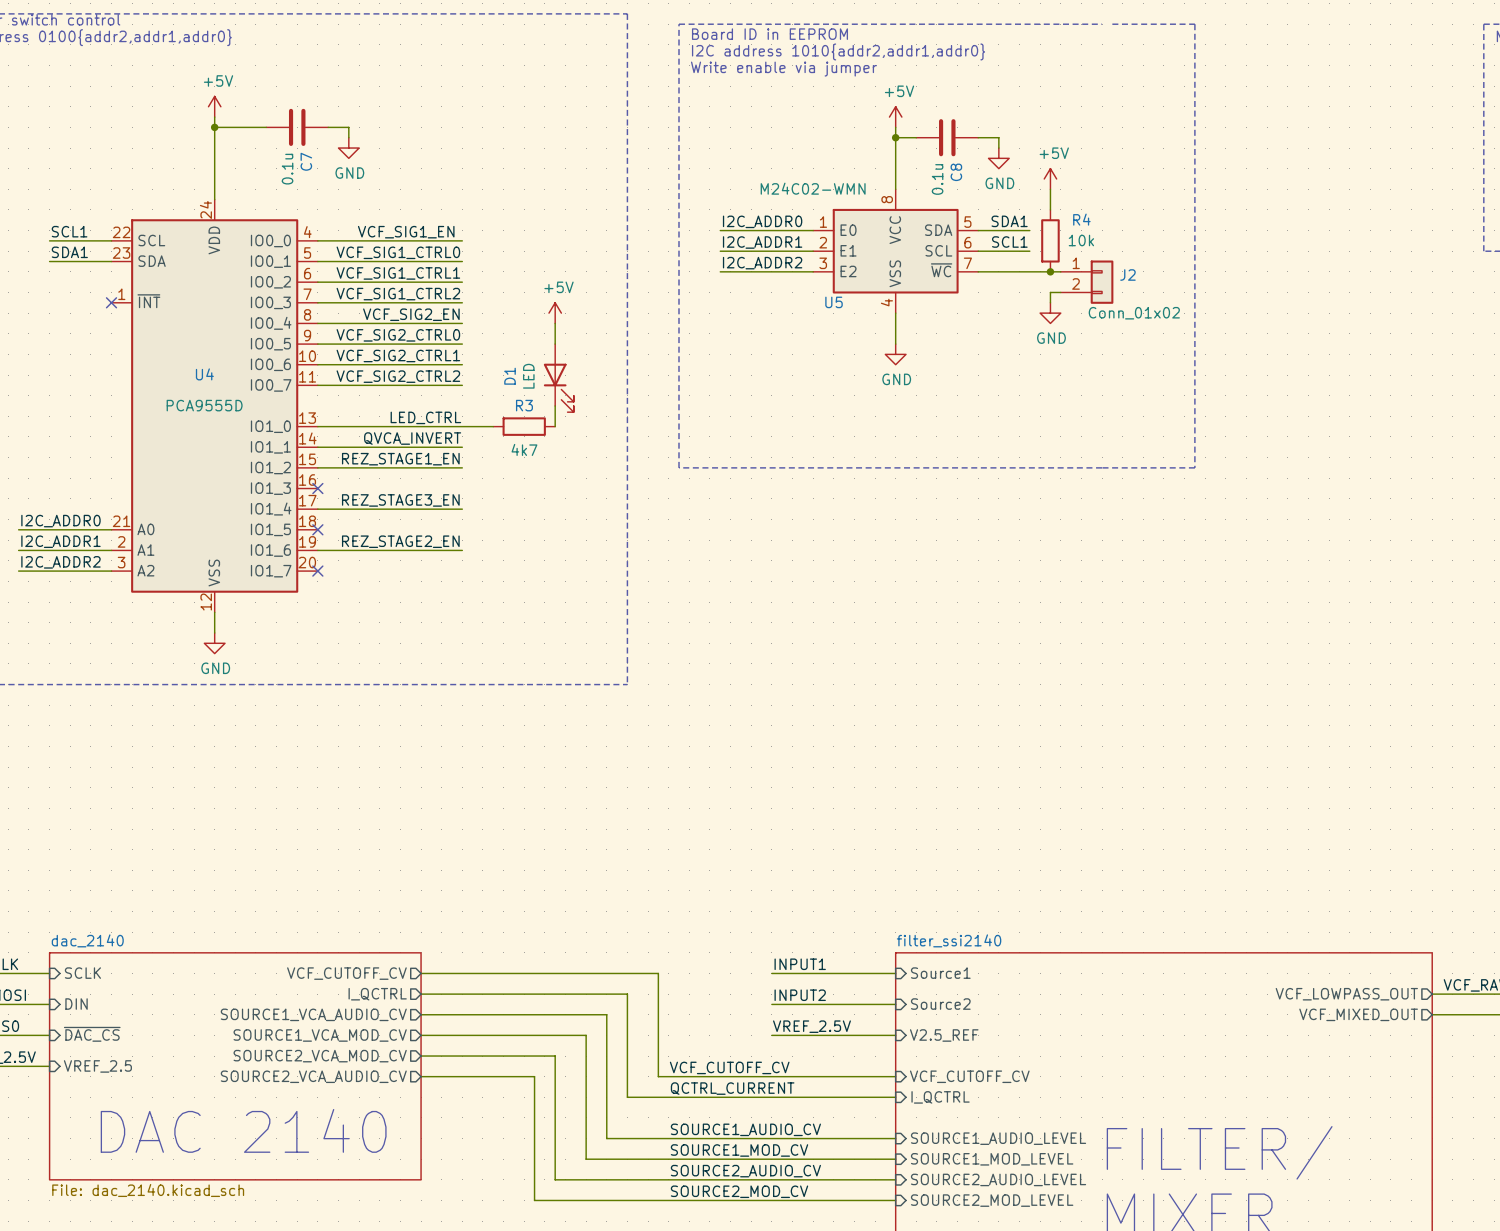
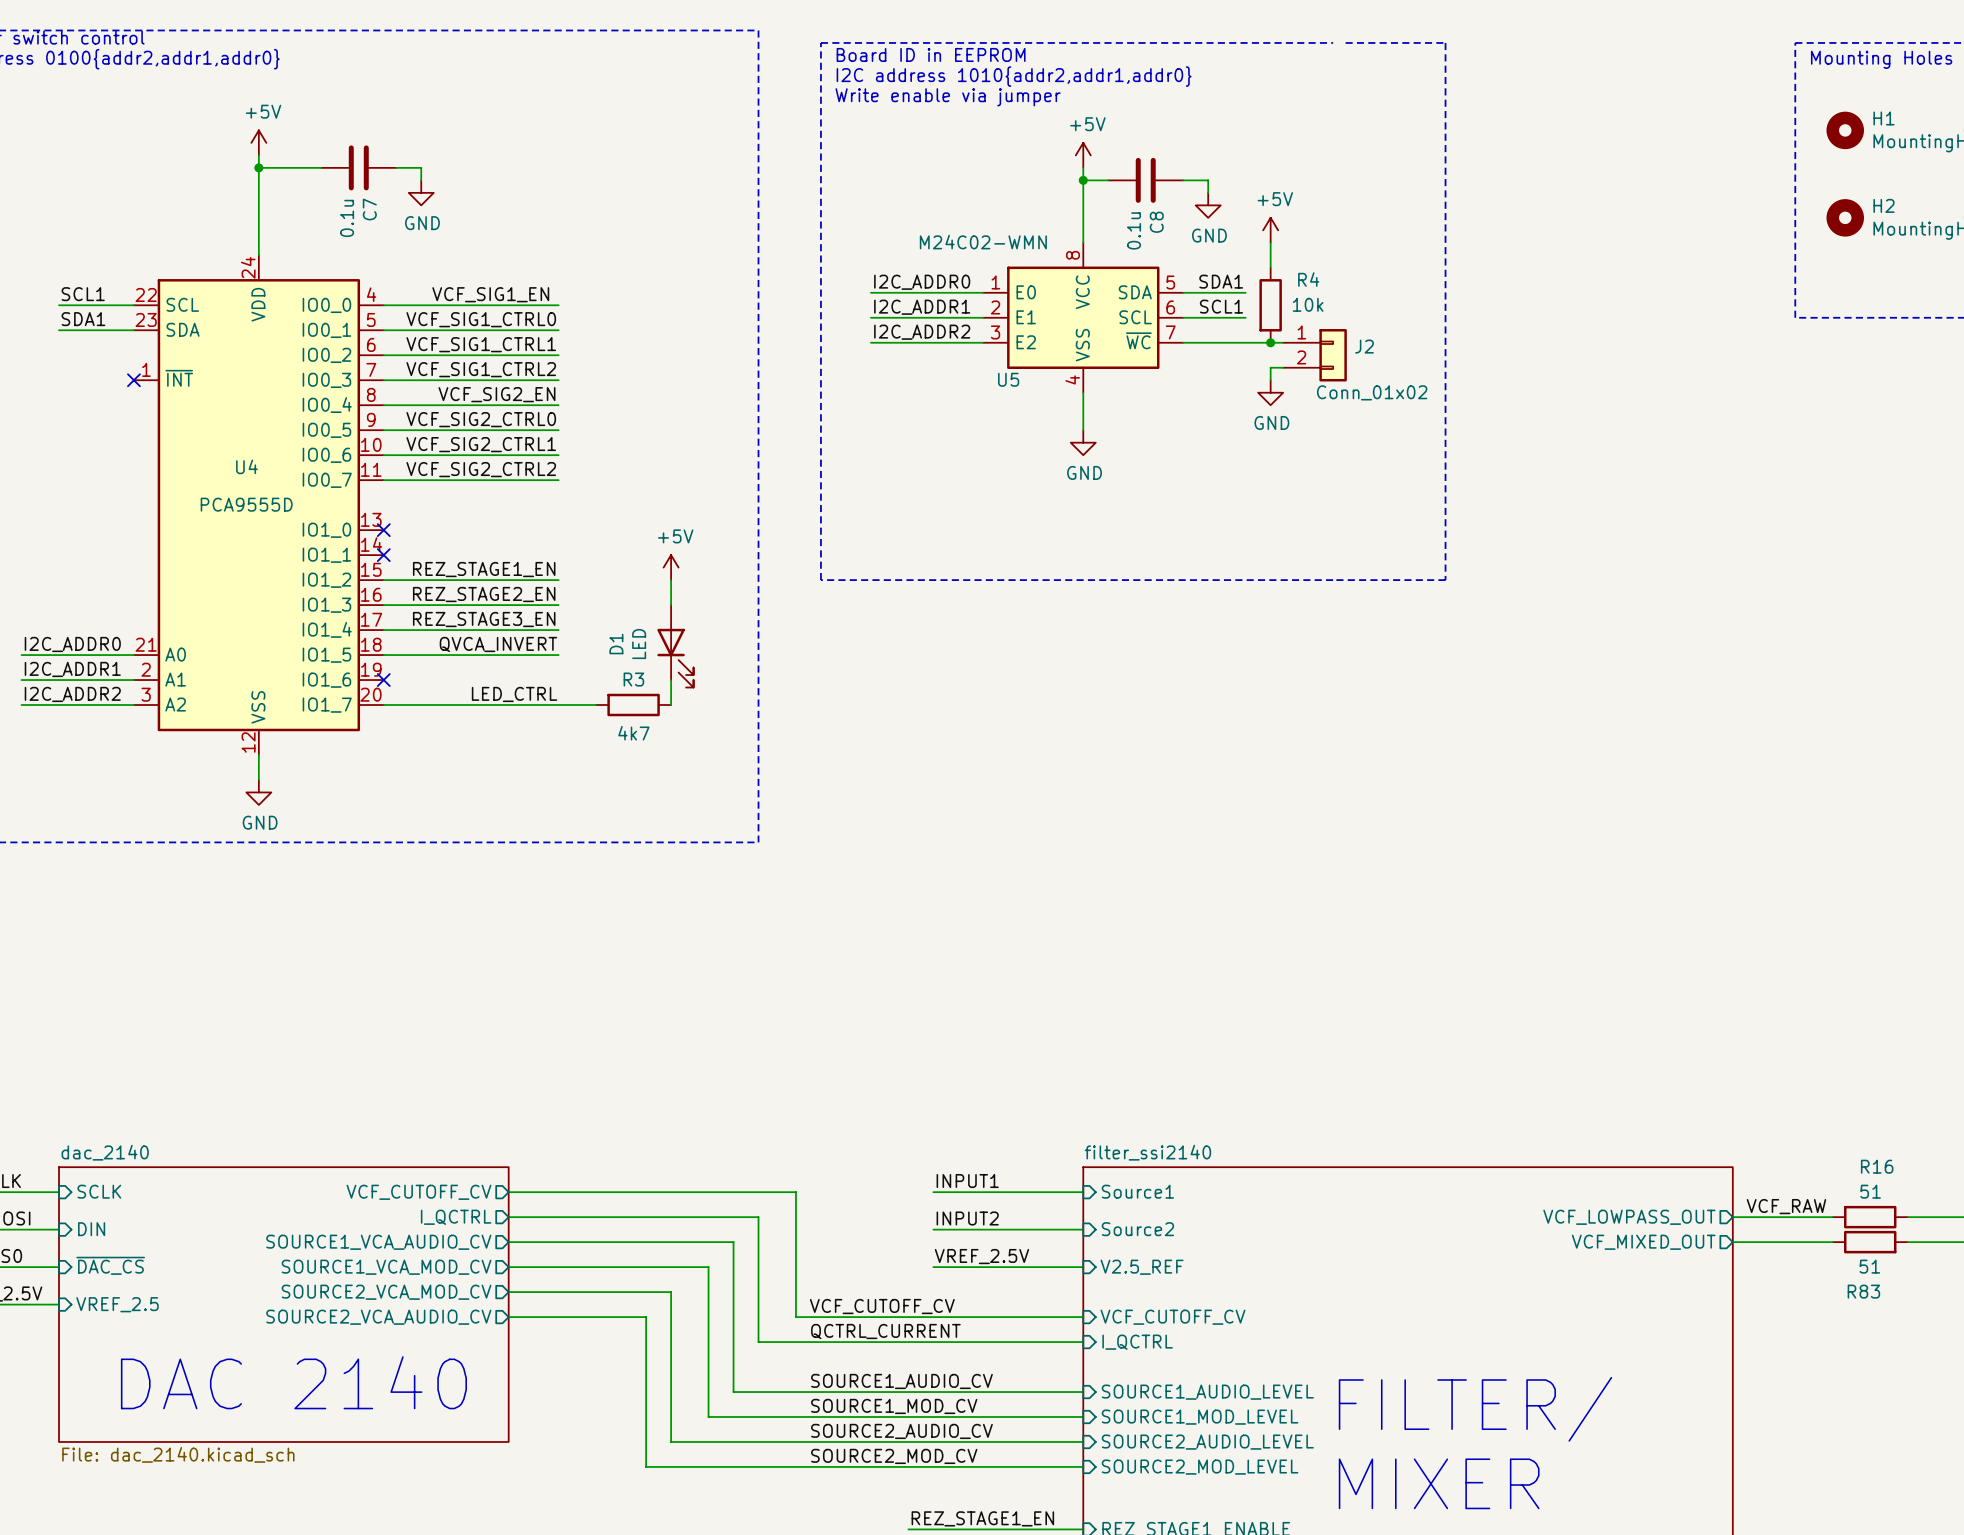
power symbol position: +5V (555, 313) -> +5V (671, 567)
wire: (555, 323) (555, 344) -> (671, 580) (671, 605)
D1 position: (558, 378) -> (675, 646)
wire: (555, 405) (555, 426) -> (671, 680) (671, 705)
label position: LED_CTRL (425, 417) -> LED_CTRL (514, 694)
wire: (317, 426) (493, 426) -> (383, 705) (596, 705)
no-connect mark: none -> (383, 530)
R3 position: (524, 426) -> (633, 705)
label position: QVCA_INVERT (412, 438) -> QVCA_INVERT (498, 644)
wire: (317, 447) (462, 447) -> (383, 605) (558, 605)
no-connect mark: none -> (383, 555)
no-connect mark: (317, 488) -> none
no-connect mark: (317, 529) -> none
label position: REZ_STAGE2_EN (400, 541) -> REZ_STAGE2_EN (484, 594)
wire: (317, 550) (462, 550) -> (383, 655) (558, 655)
no-connect mark: none -> (383, 680)
no-connect mark: (317, 571) -> none

